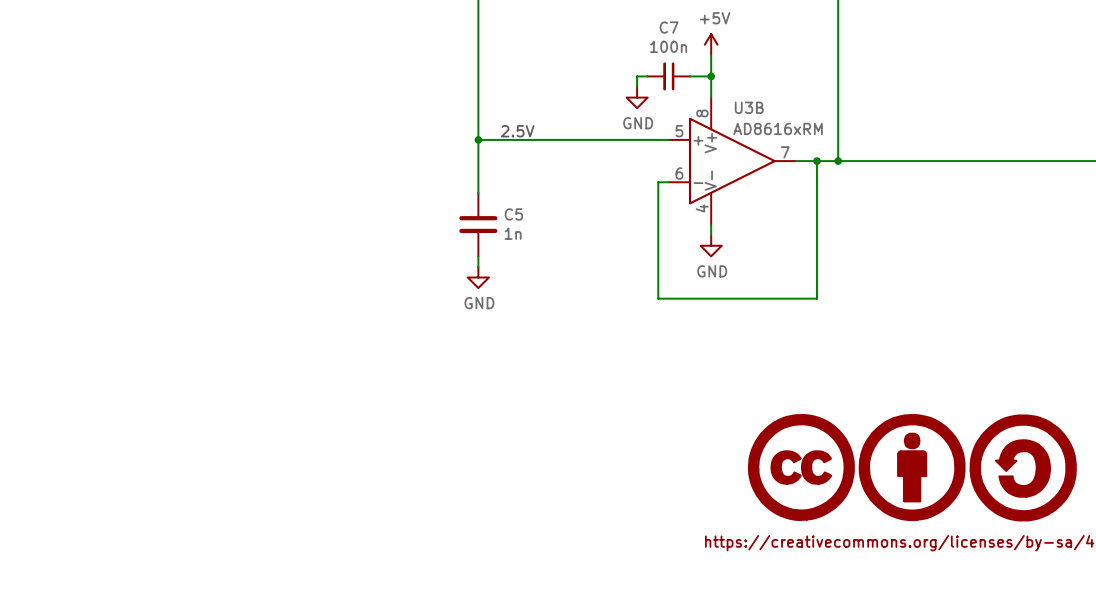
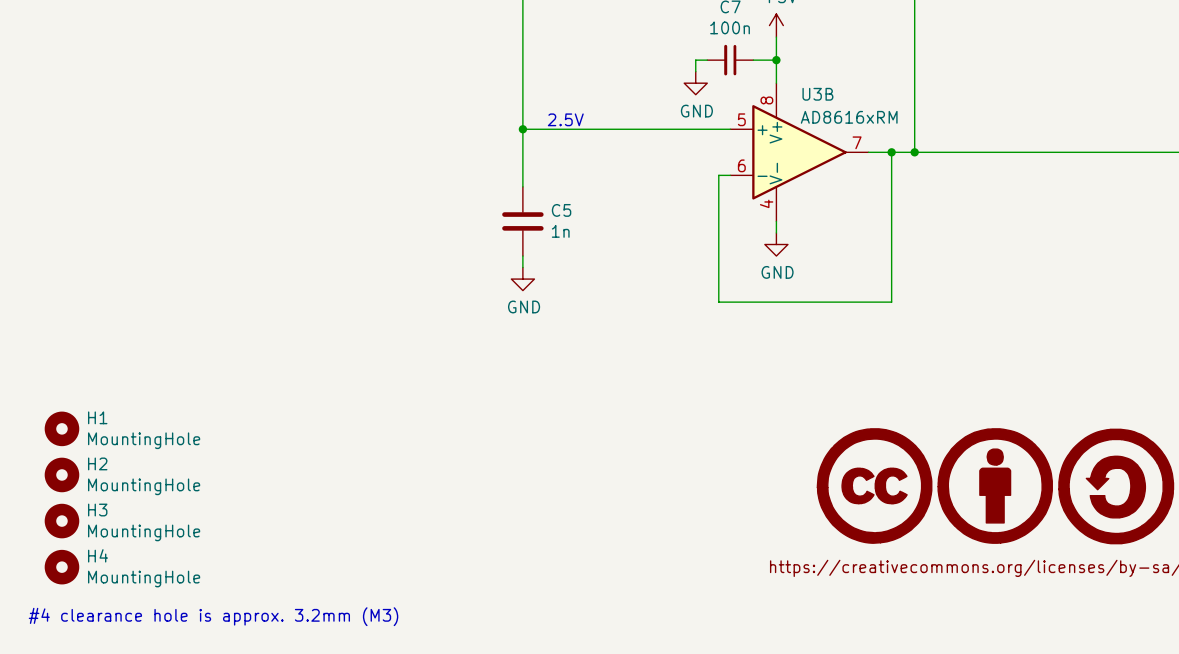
H1: none -> MountingHole (61, 428)
H2: none -> MountingHole (61, 474)
H3: none -> MountingHole (61, 521)
H4: none -> MountingHole (61, 567)
text: none -> #4 clearance hole is approx. 3.2mm (M3) (213, 616)

